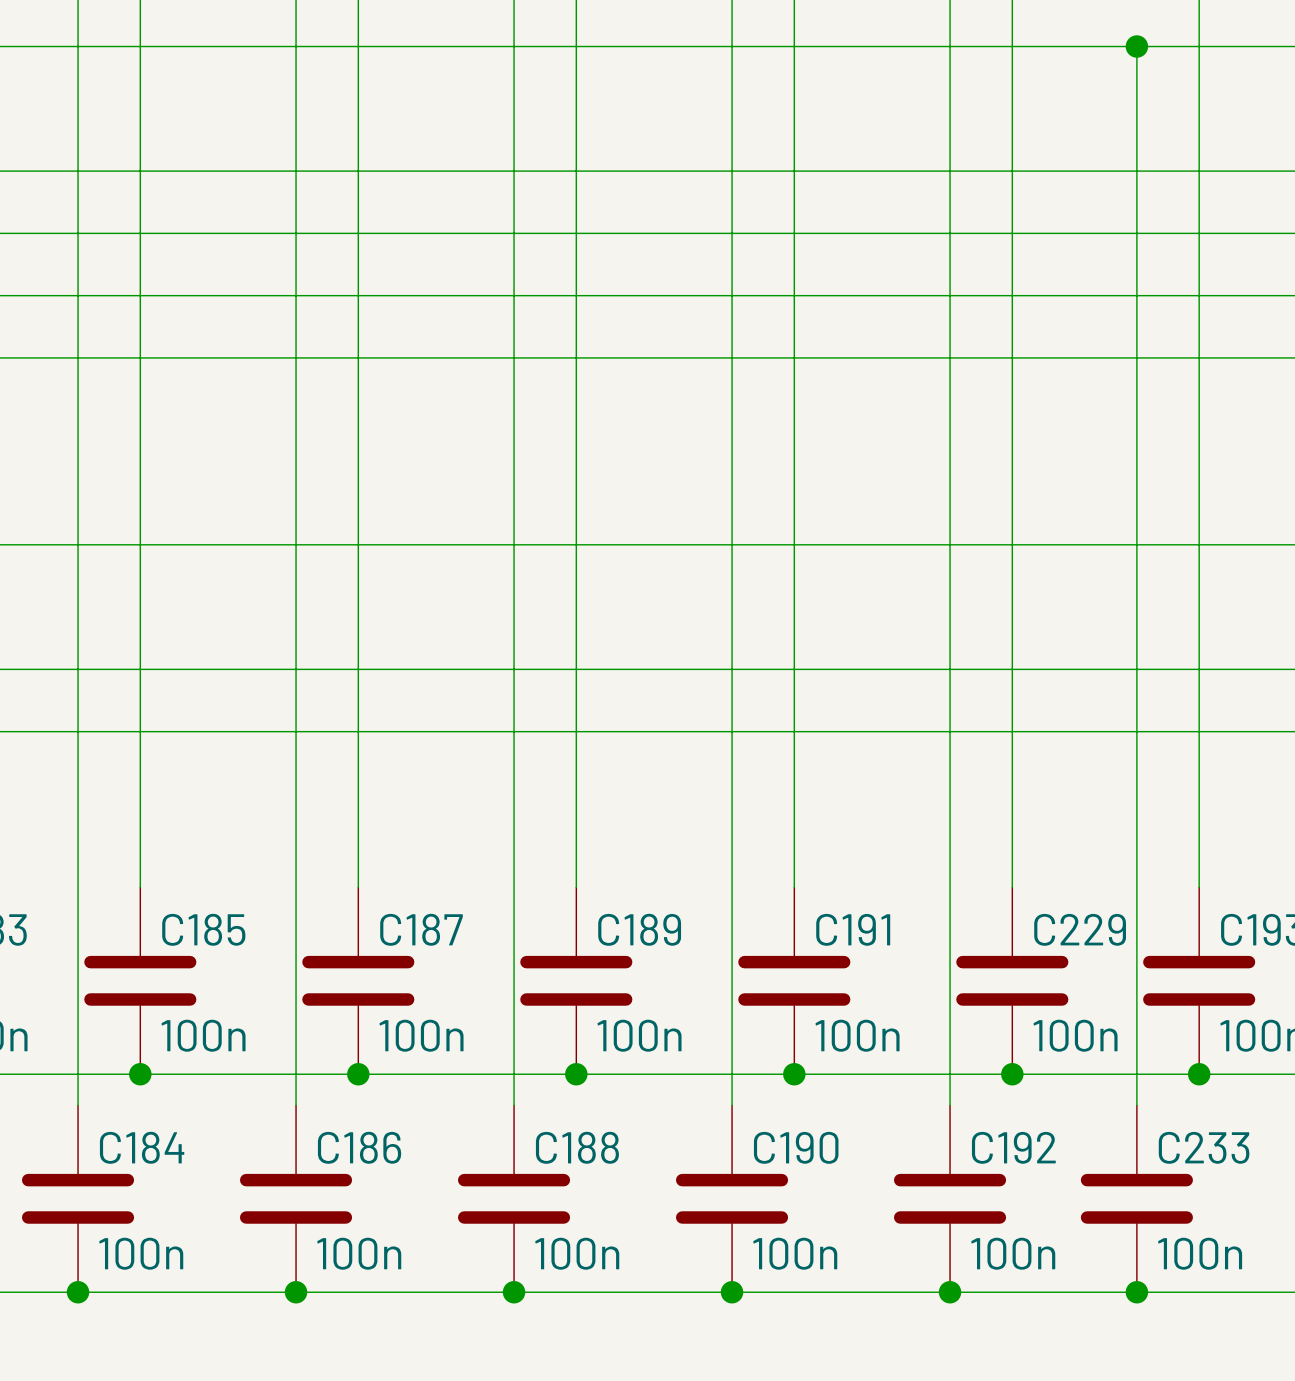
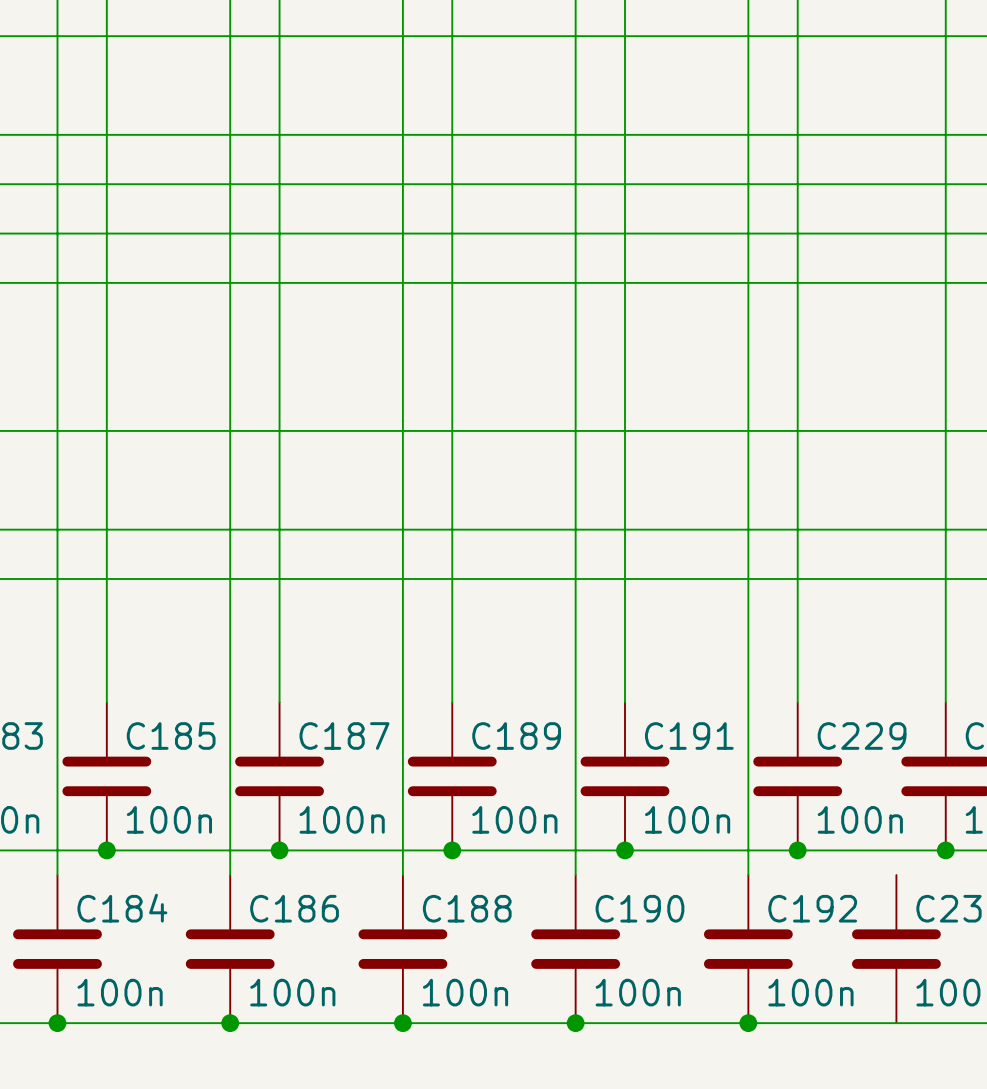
wire: (1136, 46) (1136, 1105) -> none
junction: (1136, 46) -> none
junction: (1136, 1292) -> none

